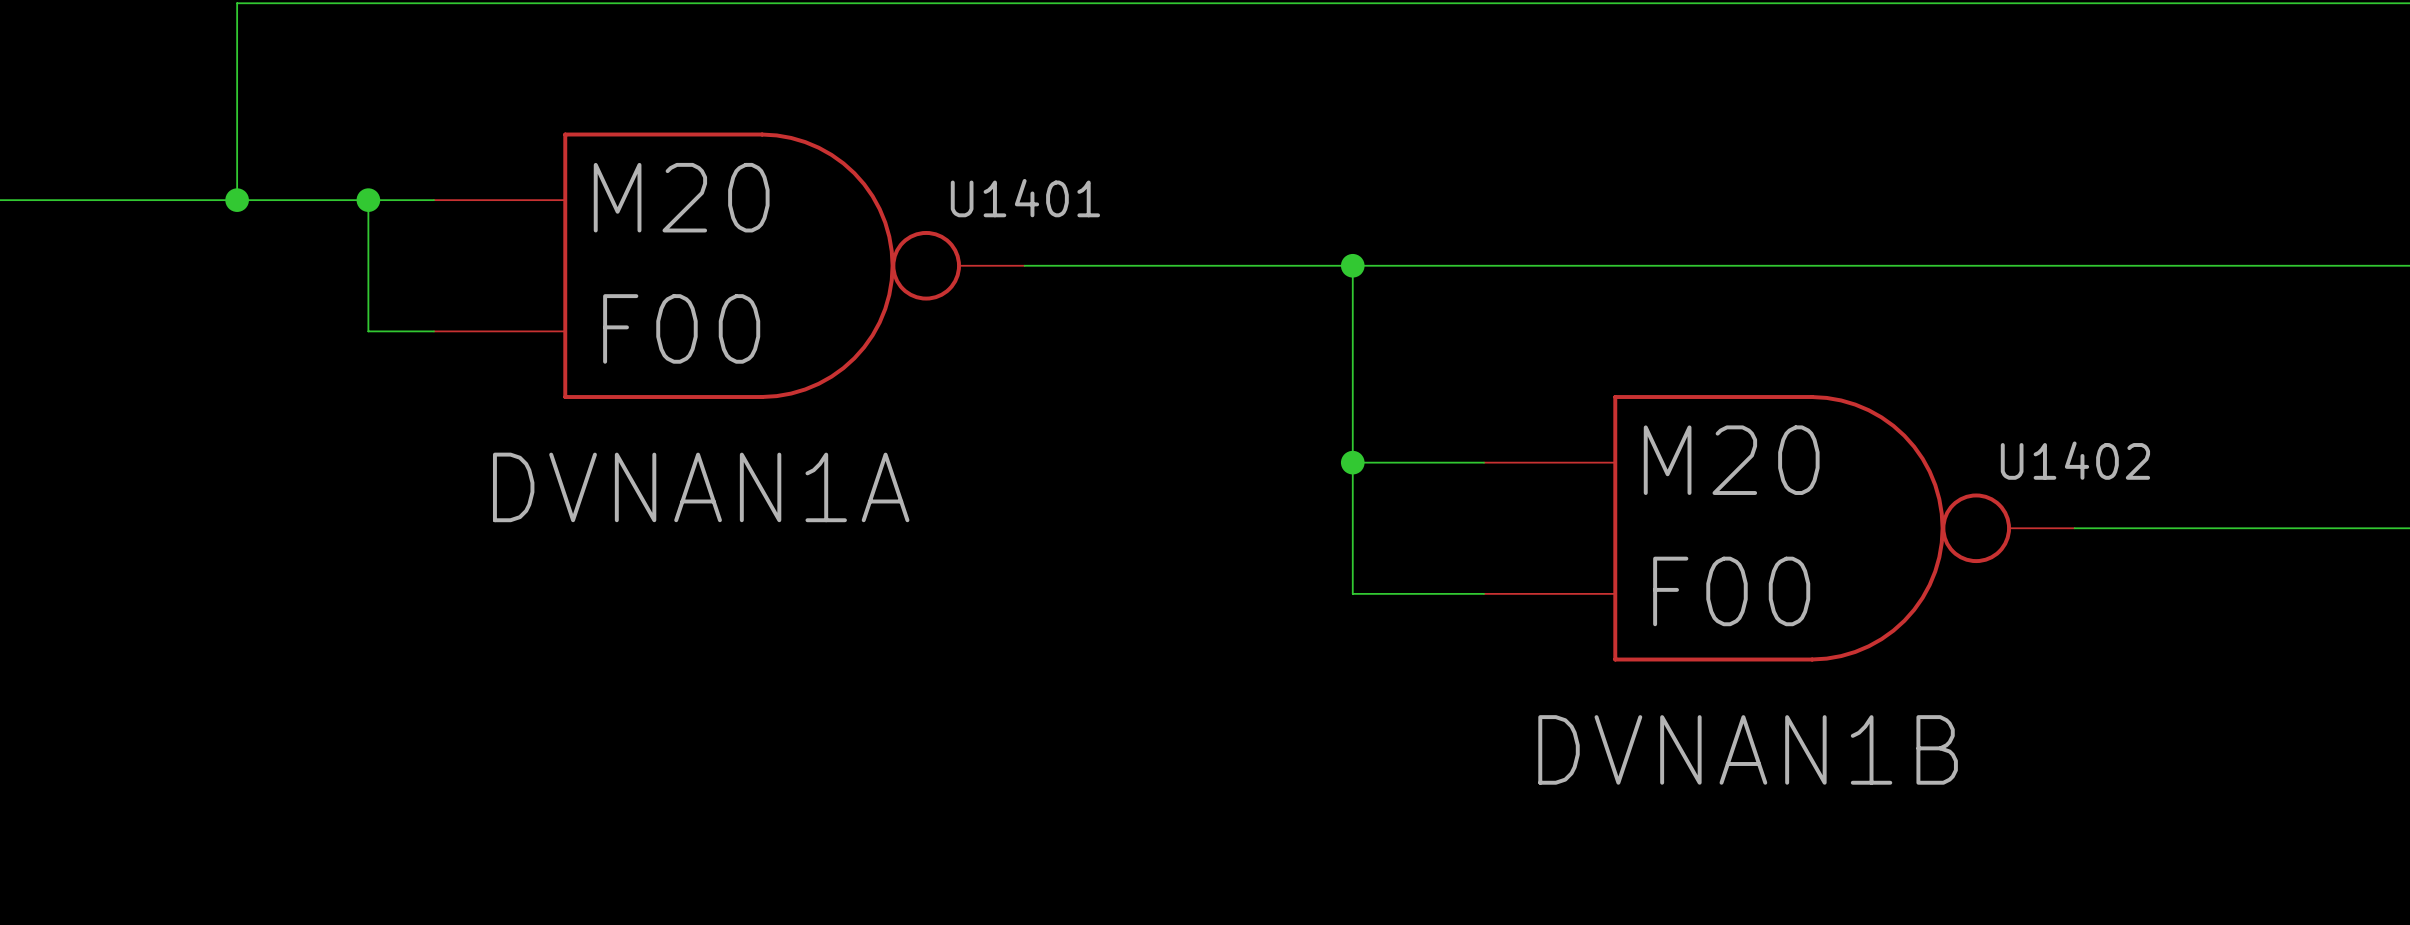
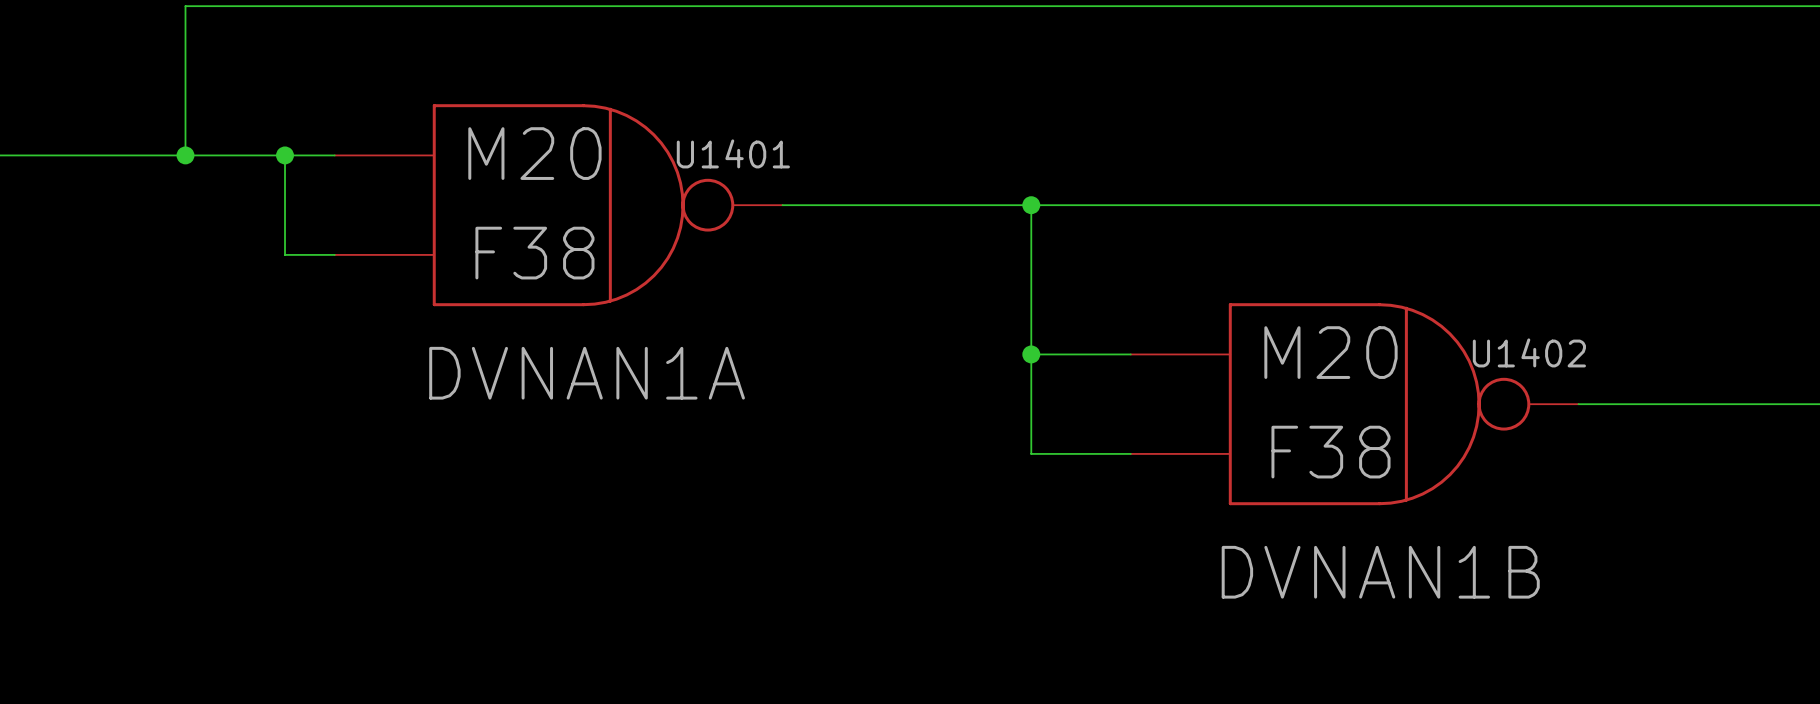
U1401 symbol: [434, 132, 1025, 399] -> [334, 104, 783, 307]
U1401 name position: U1401 (1025, 198) -> U1401 (733, 153)
U1401 value: F00 (681, 328) -> F38 (534, 253)
U1402 symbol: [1484, 395, 2075, 662] -> [1130, 303, 1579, 506]
U1402 name position: U1402 (2075, 460) -> U1402 (1529, 352)
U1401 text position: DVNAN1A (701, 487) -> DVNAN1A (587, 373)
U1402 value: F00 (1731, 591) -> F38 (1330, 452)
U1402 text position: DVNAN1B (1748, 749) -> DVNAN1B (1380, 572)

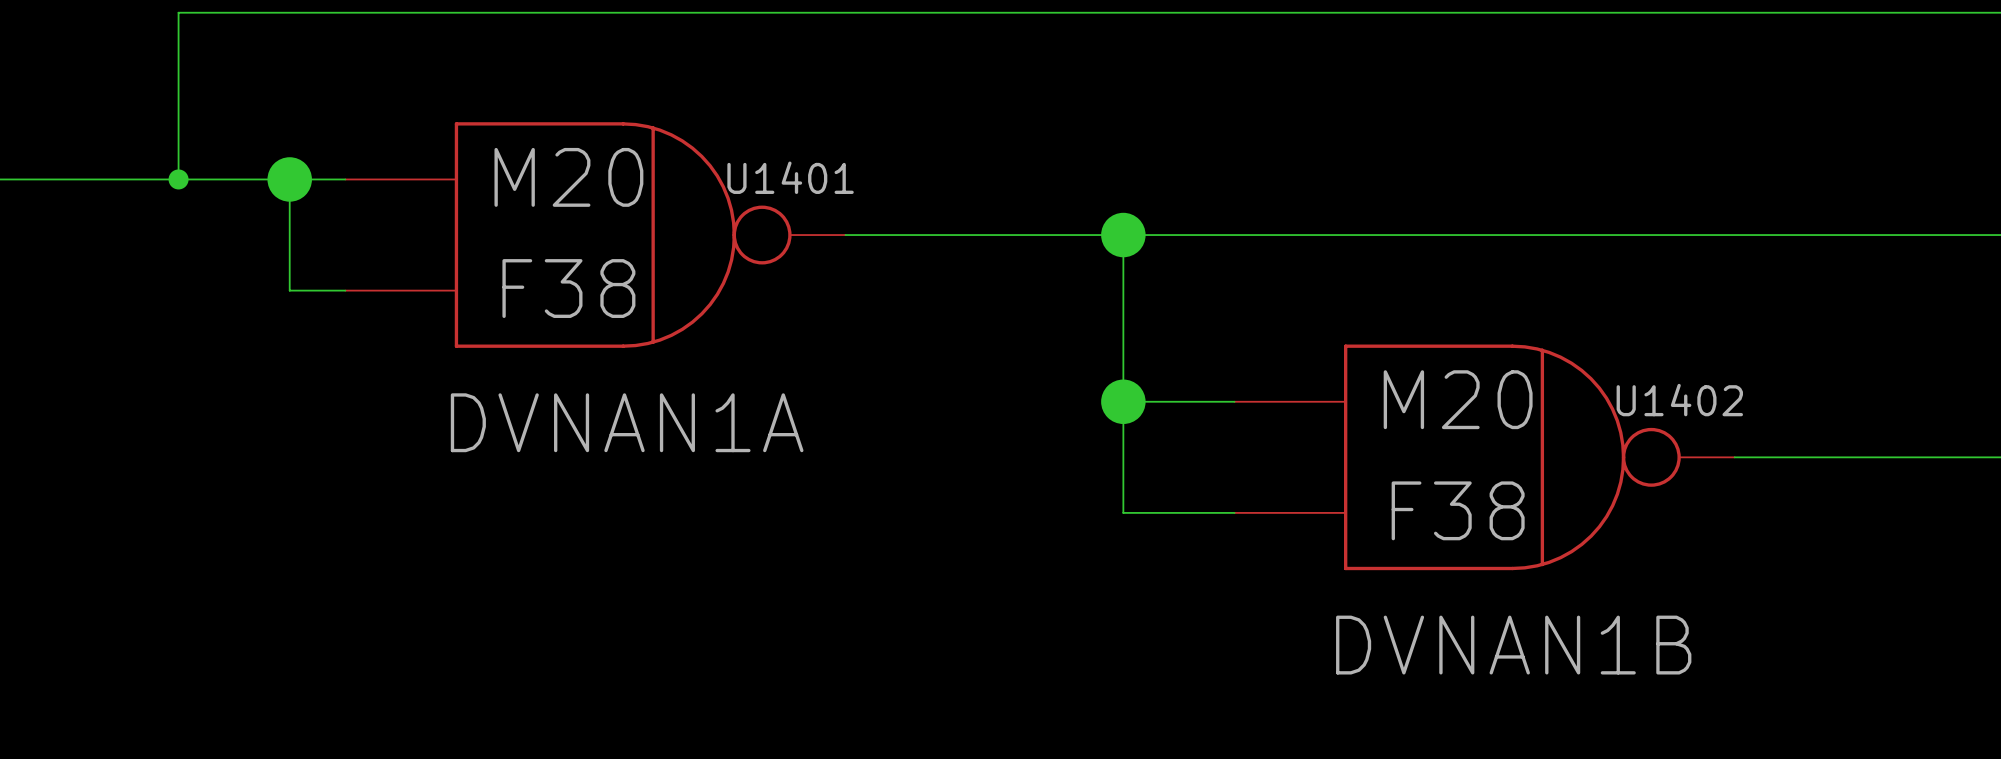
junction size: [276, 146, 294, 165] -> [267, 157, 312, 202]
junction size: [1022, 196, 1041, 215] -> [1101, 212, 1146, 258]
junction size: [1022, 345, 1041, 364] -> [1101, 379, 1146, 424]

